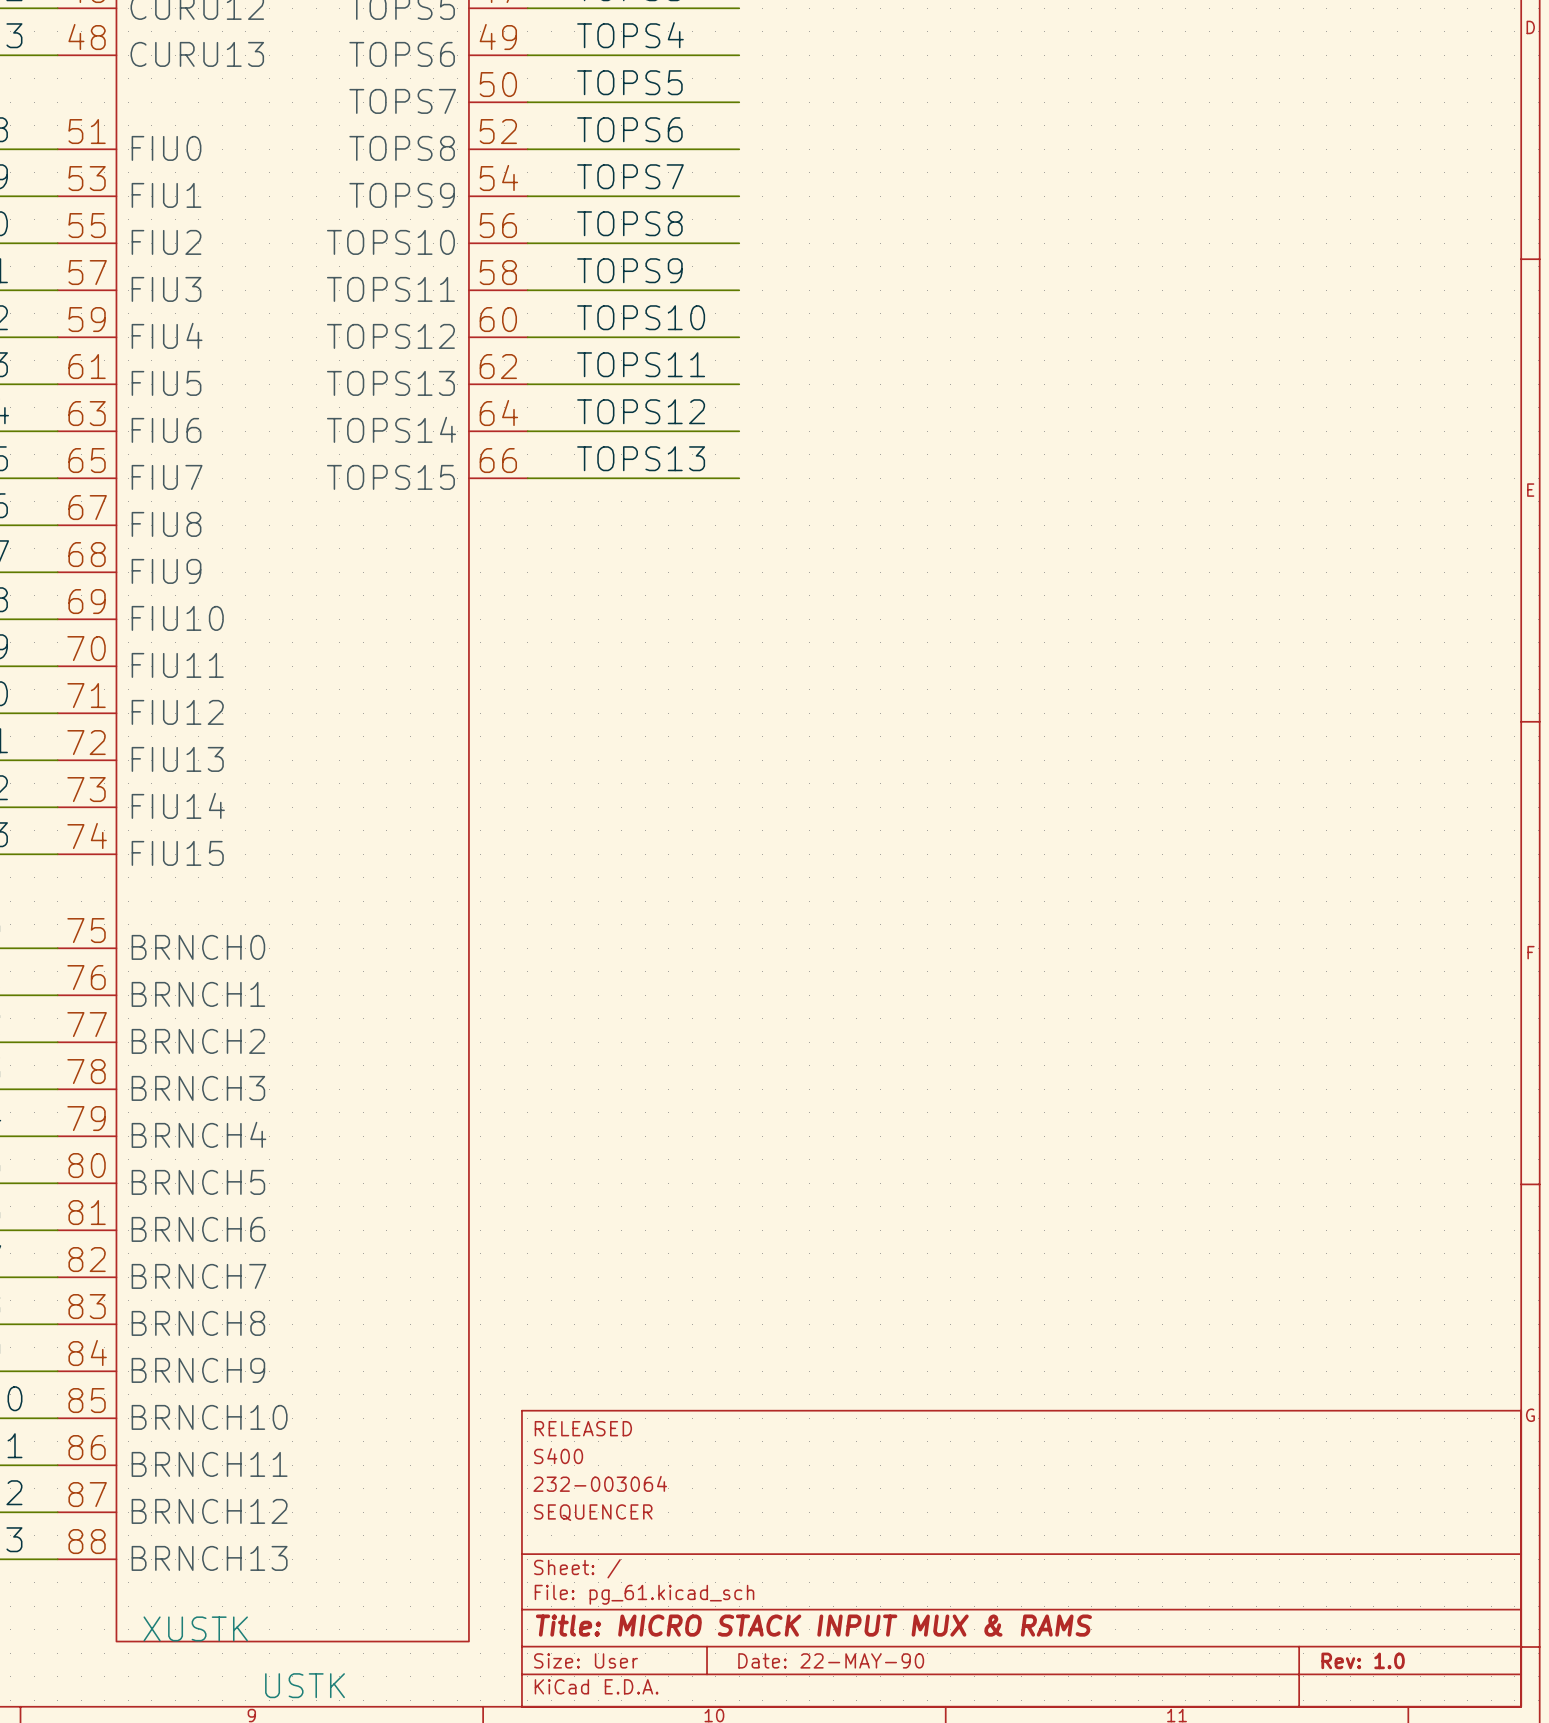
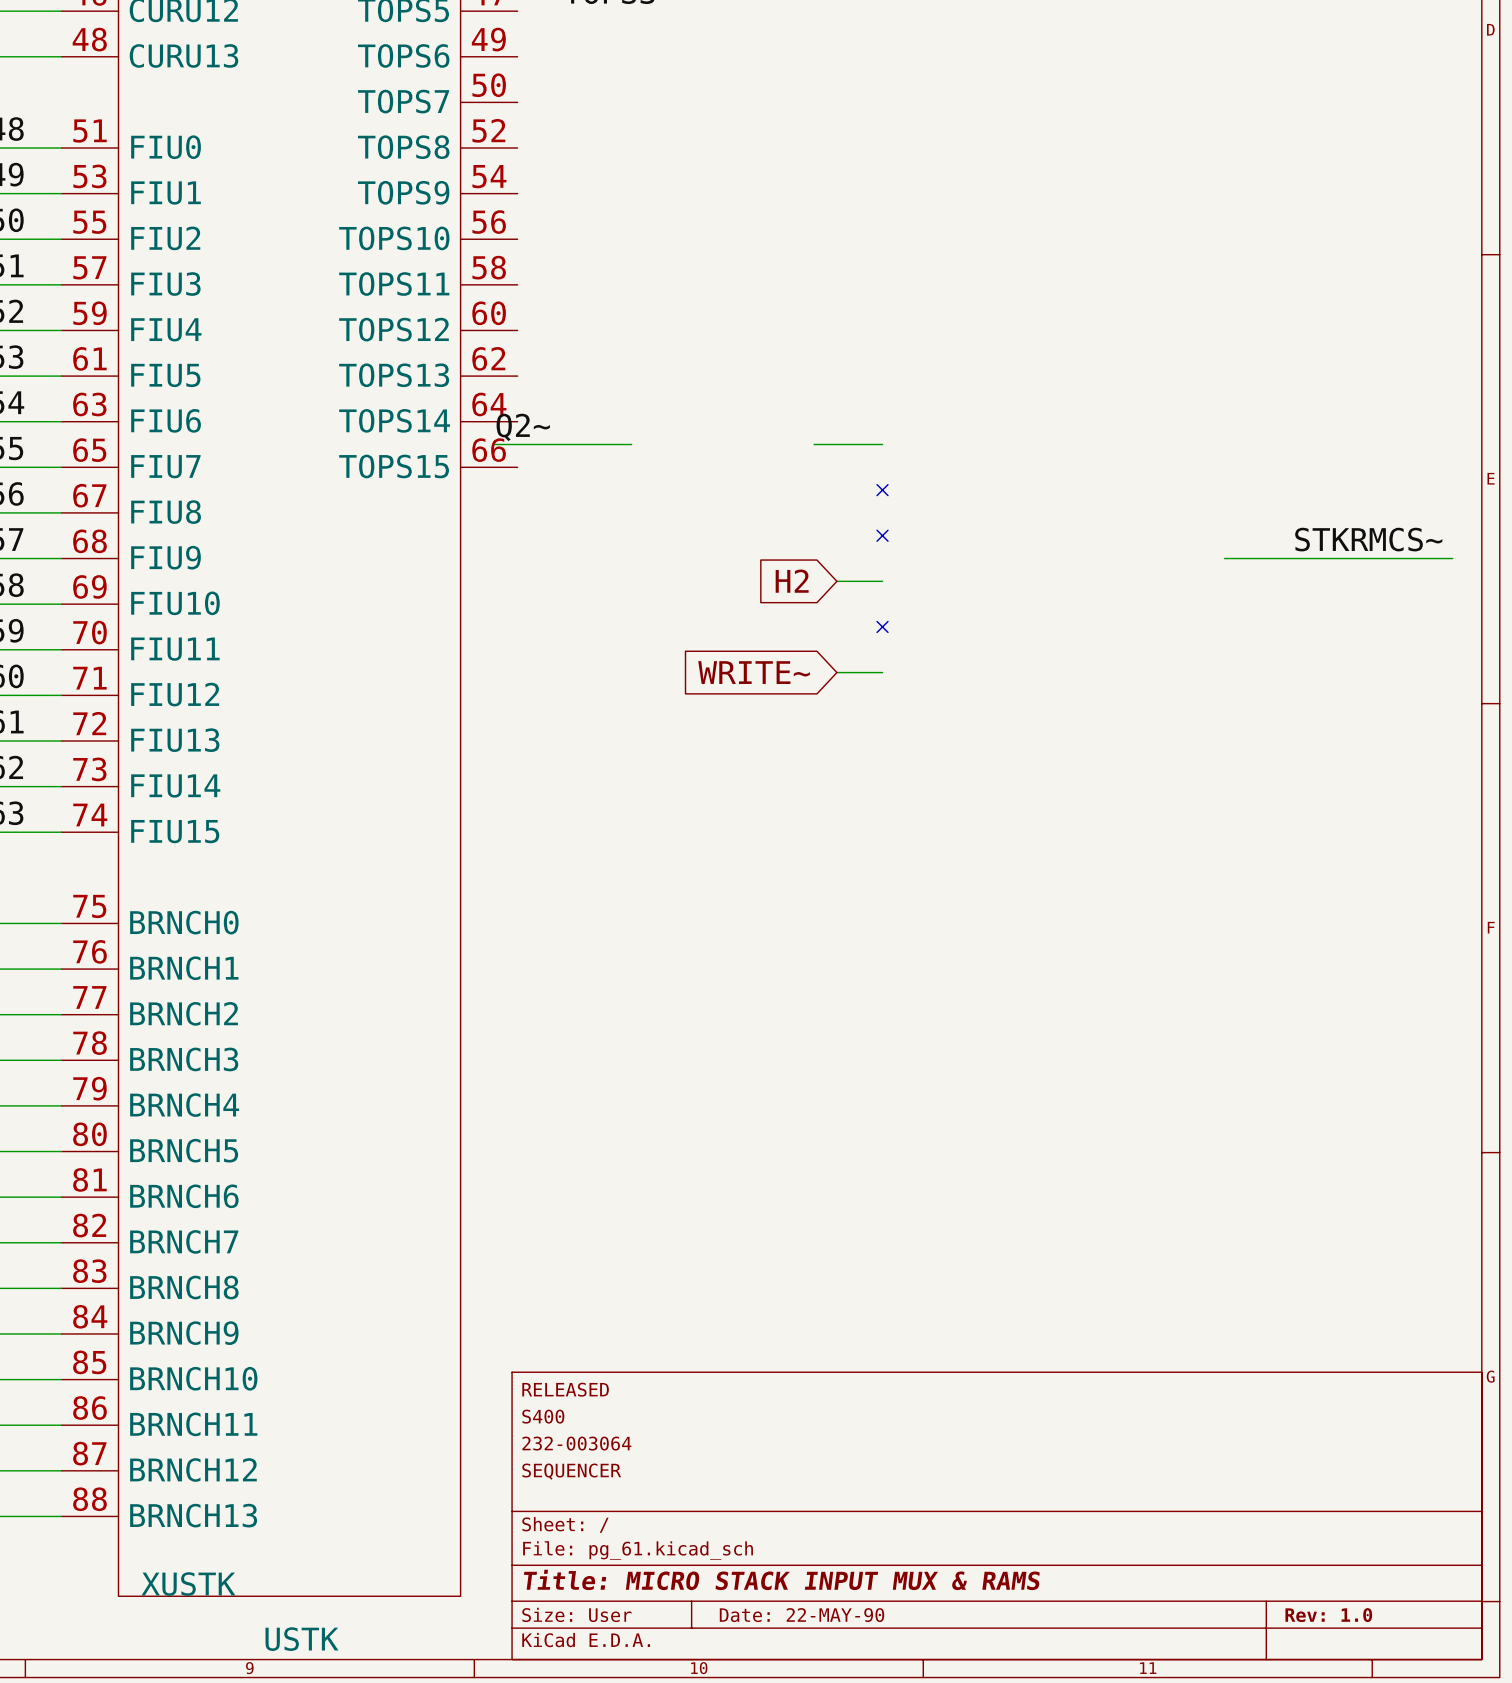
wire: (527, 8) (739, 8) -> none
label: TOPS4 (630, 35) -> none
wire: (527, 55) (739, 55) -> none
label: TOPS5 (629, 82) -> none
wire: (527, 102) (739, 102) -> none
label: TOPS6 (629, 129) -> none
wire: (527, 149) (739, 149) -> none
label: TOPS7 (630, 176) -> none
wire: (527, 196) (739, 196) -> none
label: TOPS8 (629, 223) -> none
wire: (527, 243) (739, 243) -> none
label: TOPS9 (629, 270) -> none
wire: (527, 290) (739, 290) -> none
label: TOPS10 (641, 317) -> none
wire: (527, 337) (739, 337) -> none
label: TOPS11 (641, 364) -> none
wire: (527, 384) (739, 384) -> none
label: TOPS12 (641, 411) -> none
wire: (527, 431) (739, 431) -> none
label: none -> Q2~ (523, 427)
wire: none -> (494, 444) (631, 444)
wire: none -> (814, 444) (882, 444)
label: TOPS13 (641, 458) -> none
wire: (527, 478) (739, 478) -> none
no-connect mark: none -> (882, 490)
no-connect mark: none -> (882, 535)
label: none -> STKRMCS~ (1368, 539)
wire: none -> (1224, 558) (1452, 558)
global label: none -> H2 (792, 581)
wire: none -> (836, 581) (882, 581)
no-connect mark: none -> (882, 626)
global label: none -> WRITE~ (754, 672)
wire: none -> (836, 672) (882, 672)

